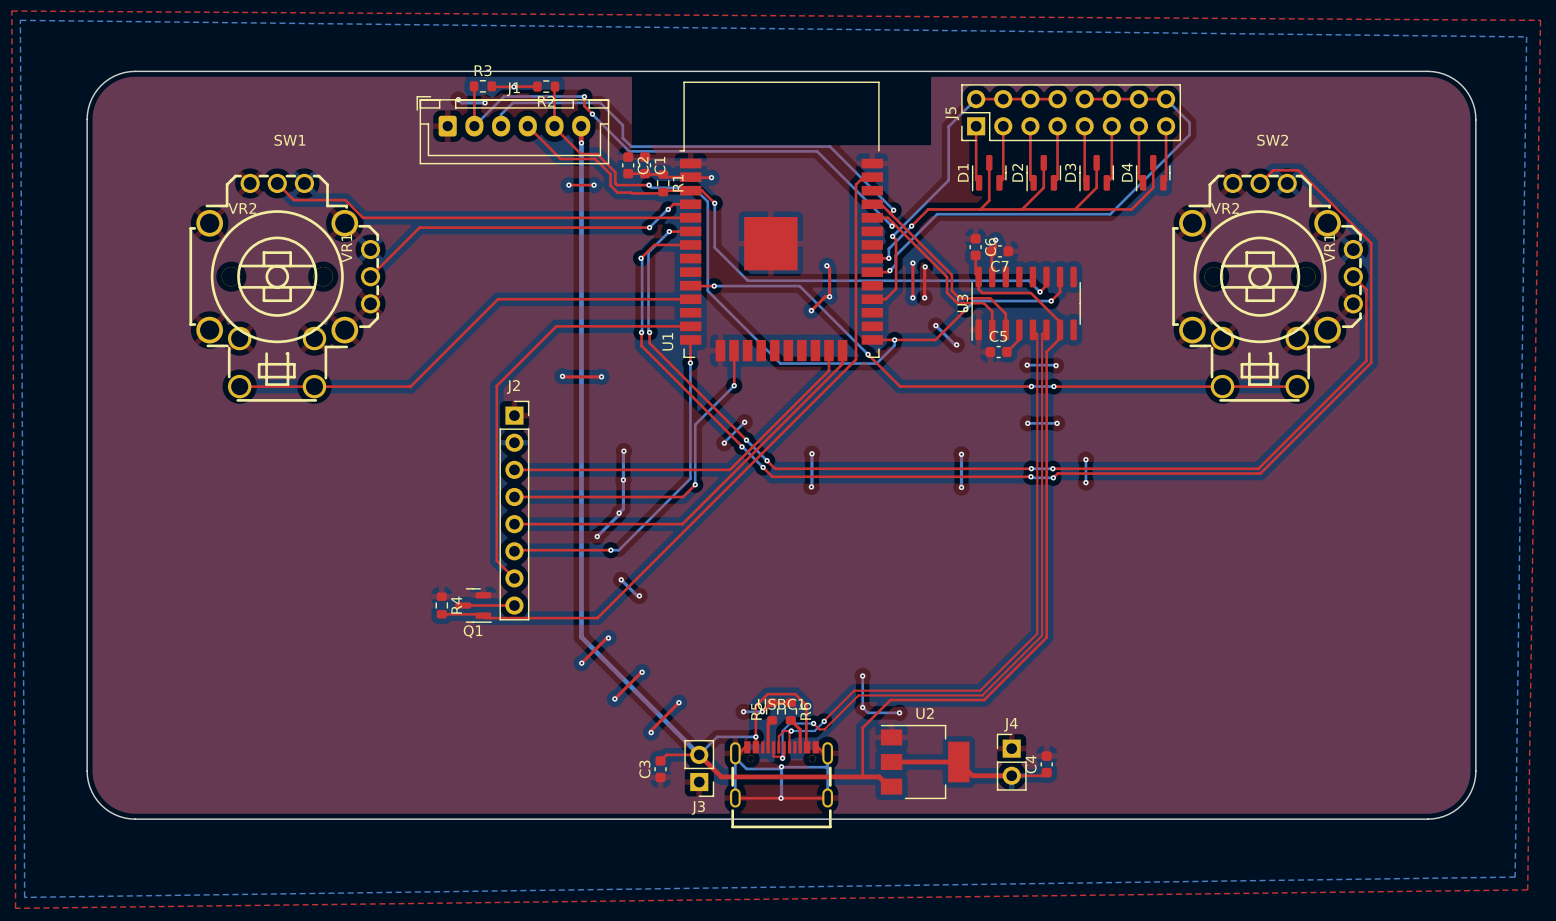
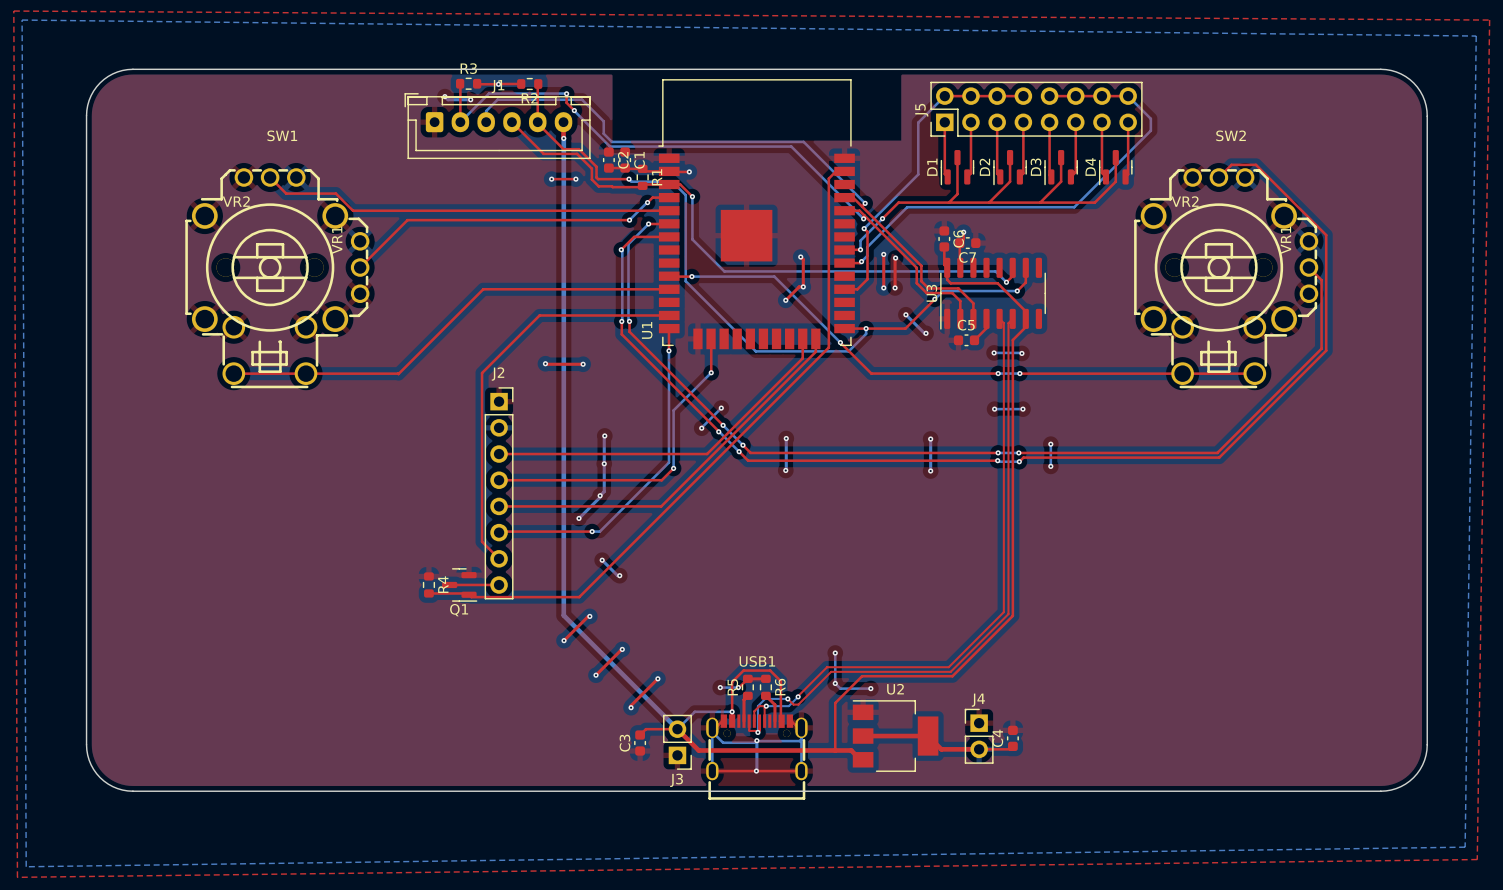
USB1: none -> (756, 757)
USBC1: (781, 784) -> none

